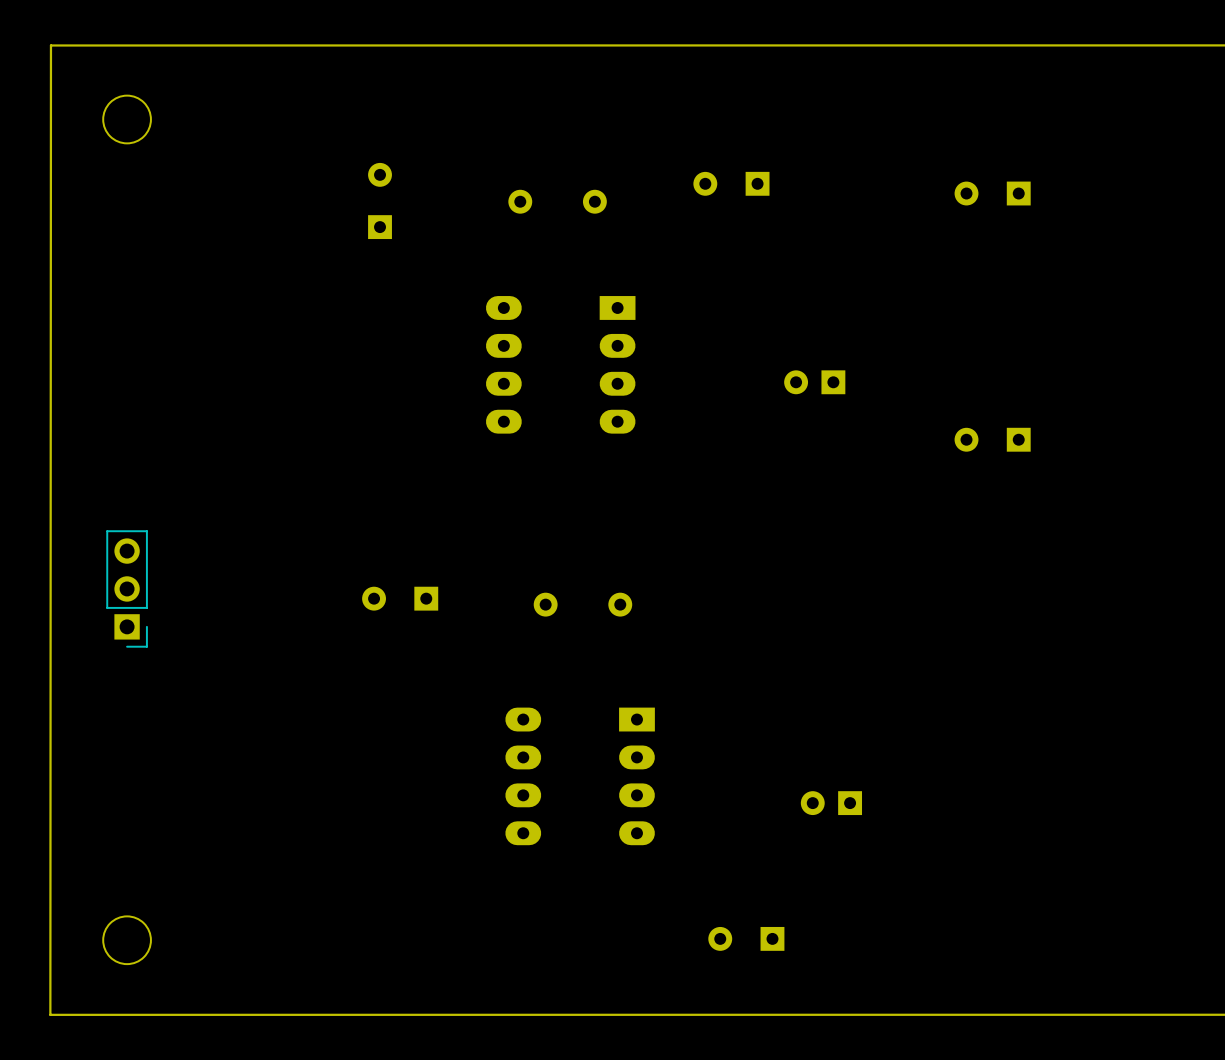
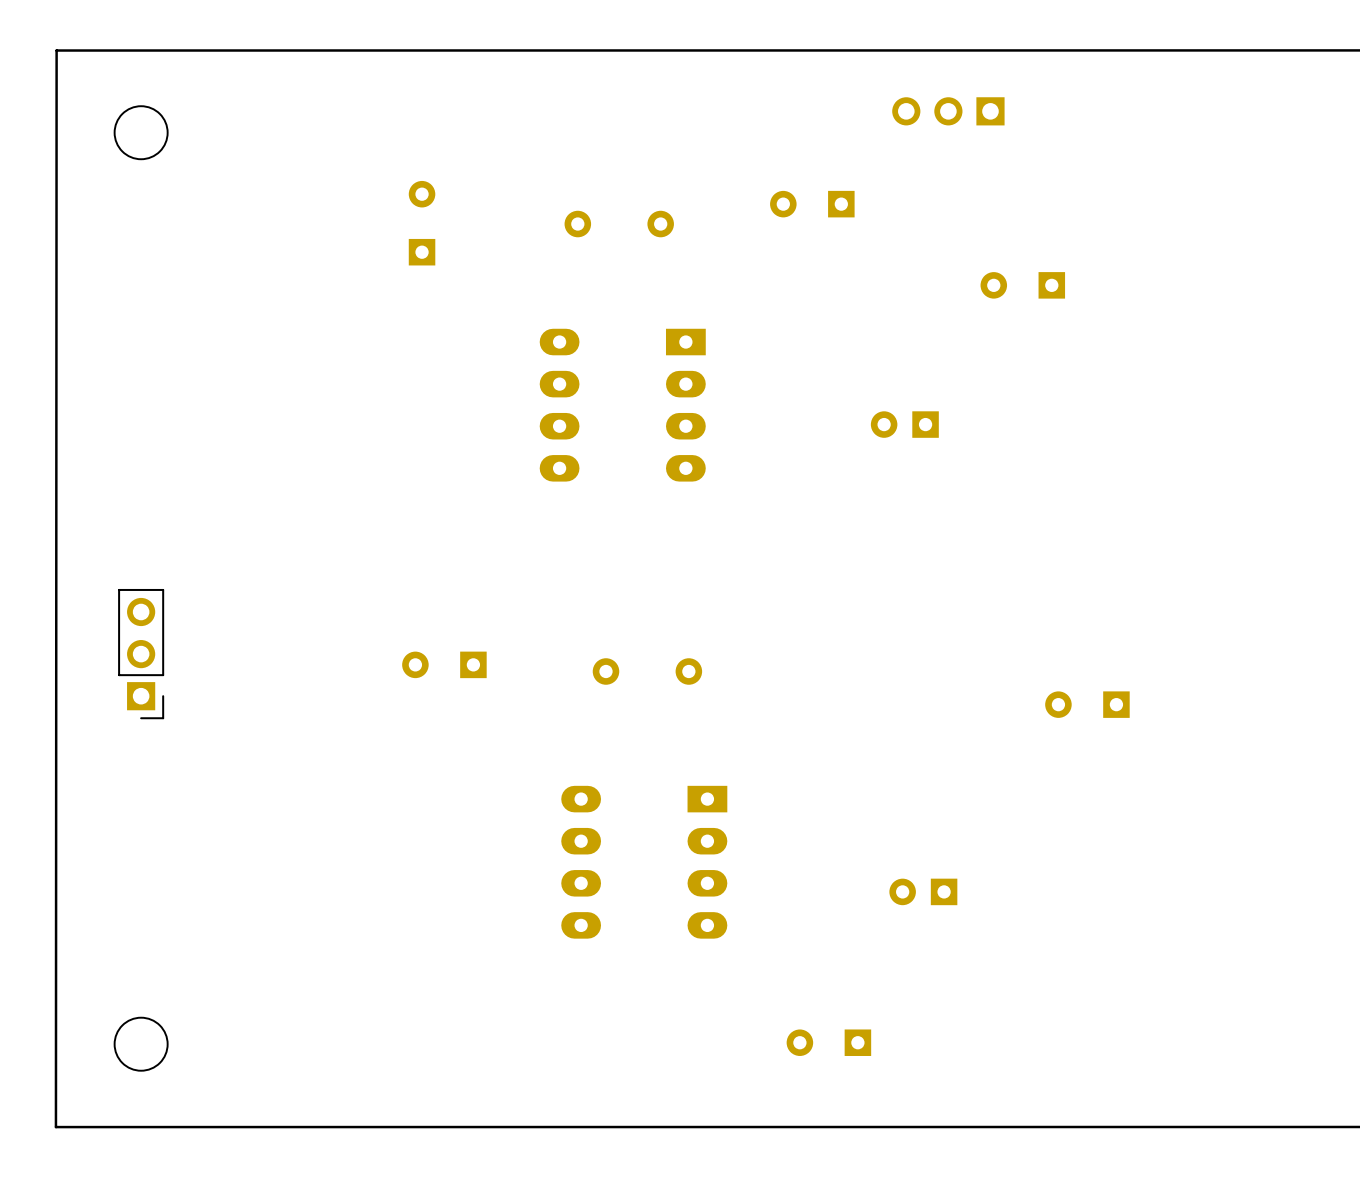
part: none -> (948, 111)
part position: (992, 193) -> (1022, 285)
part: (992, 439) -> none
part: none -> (1087, 704)

